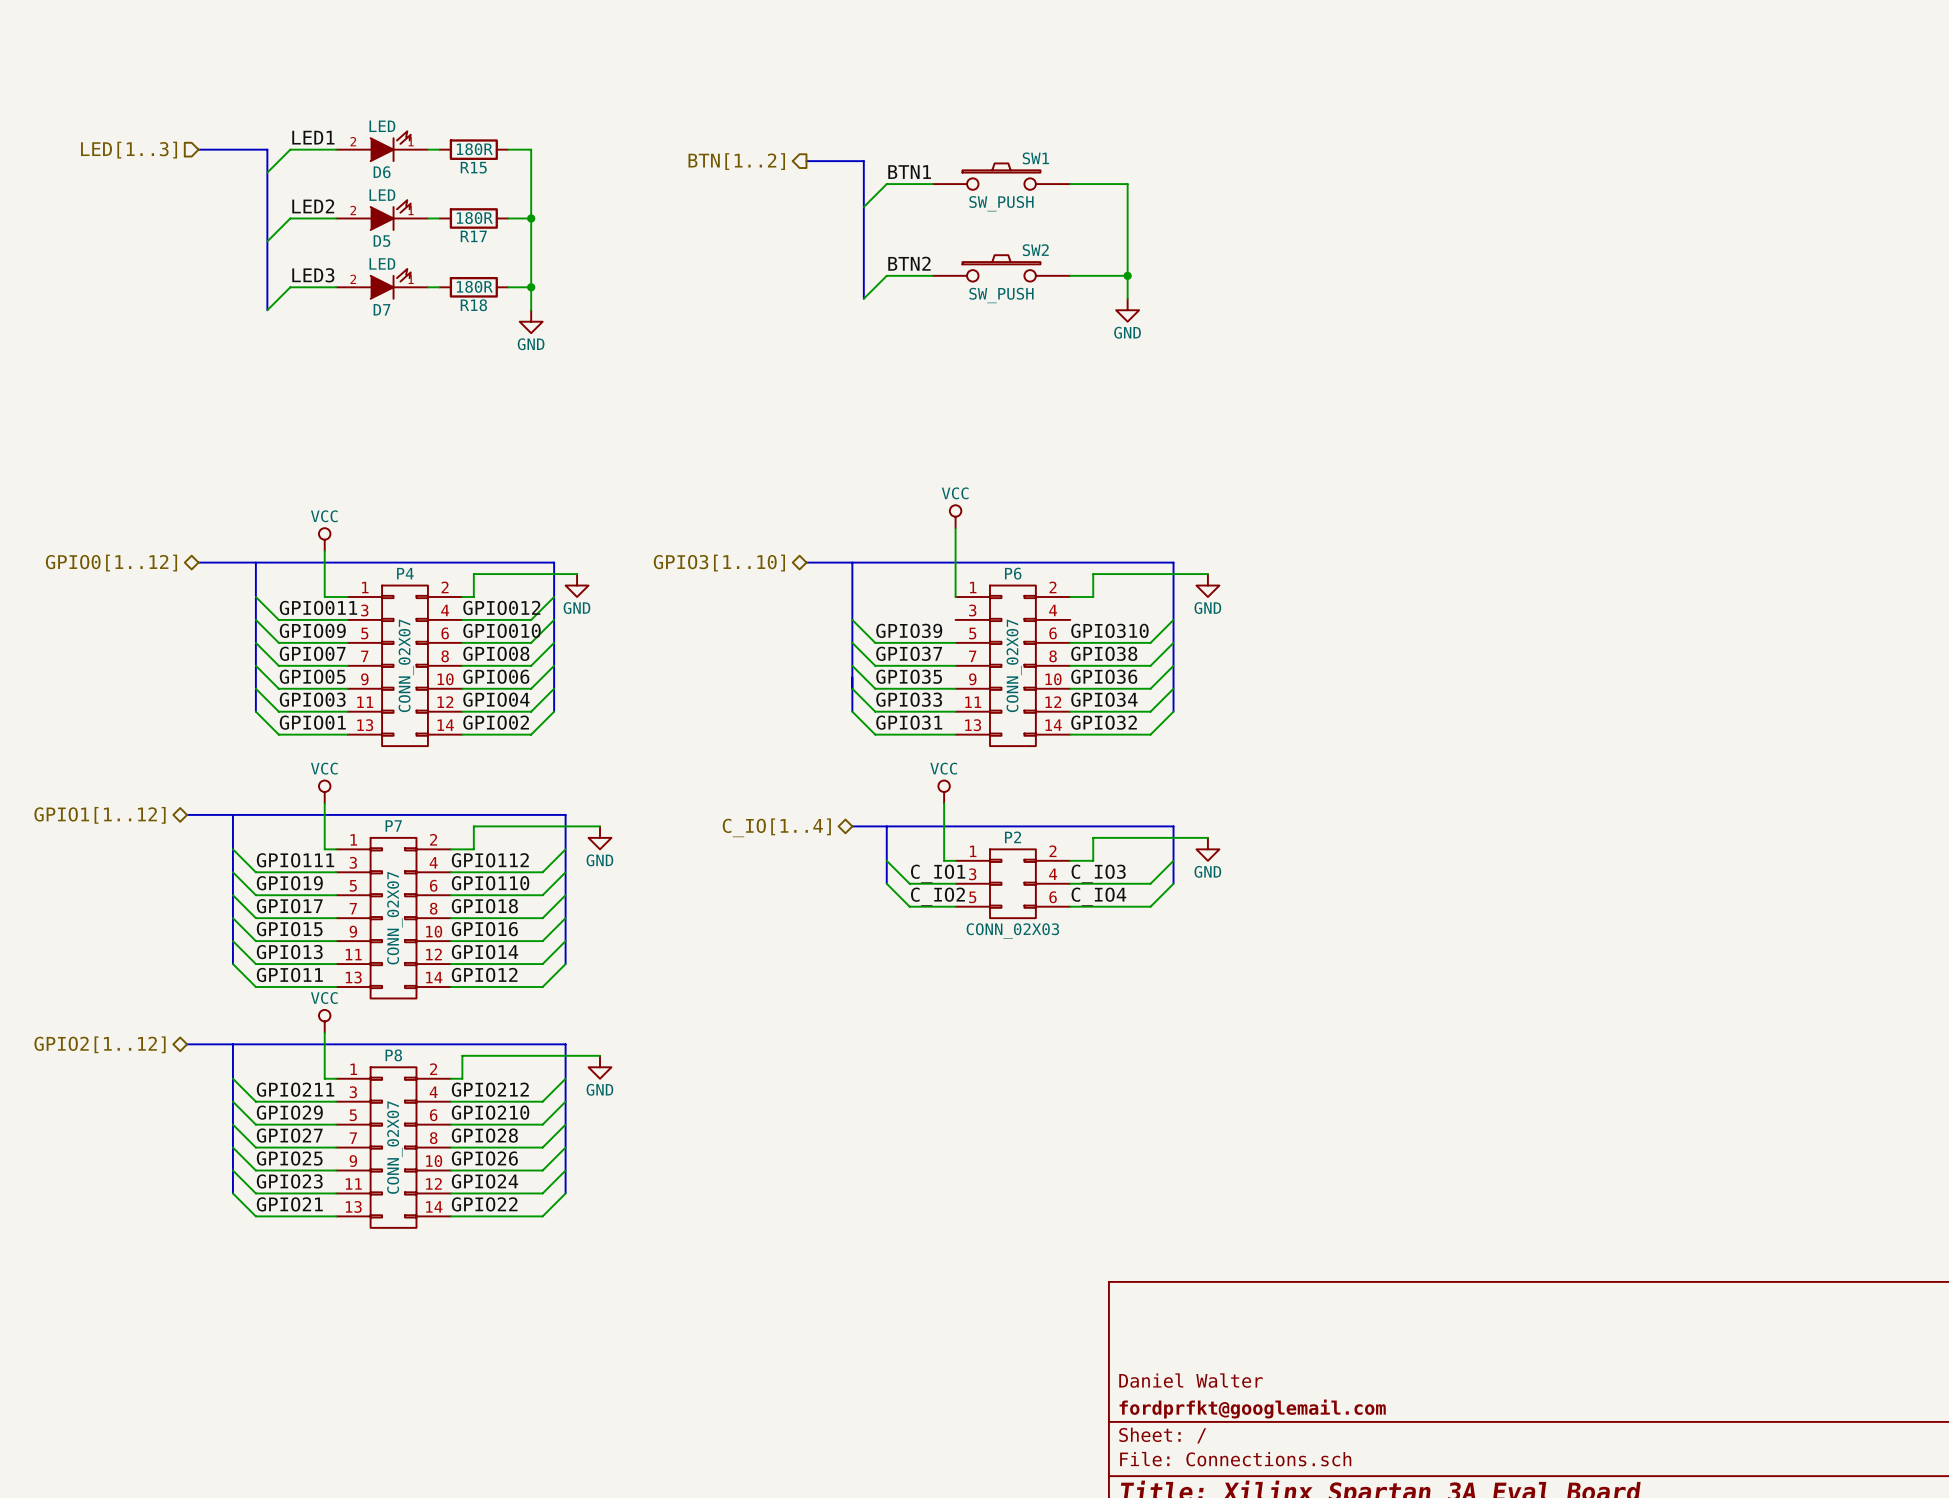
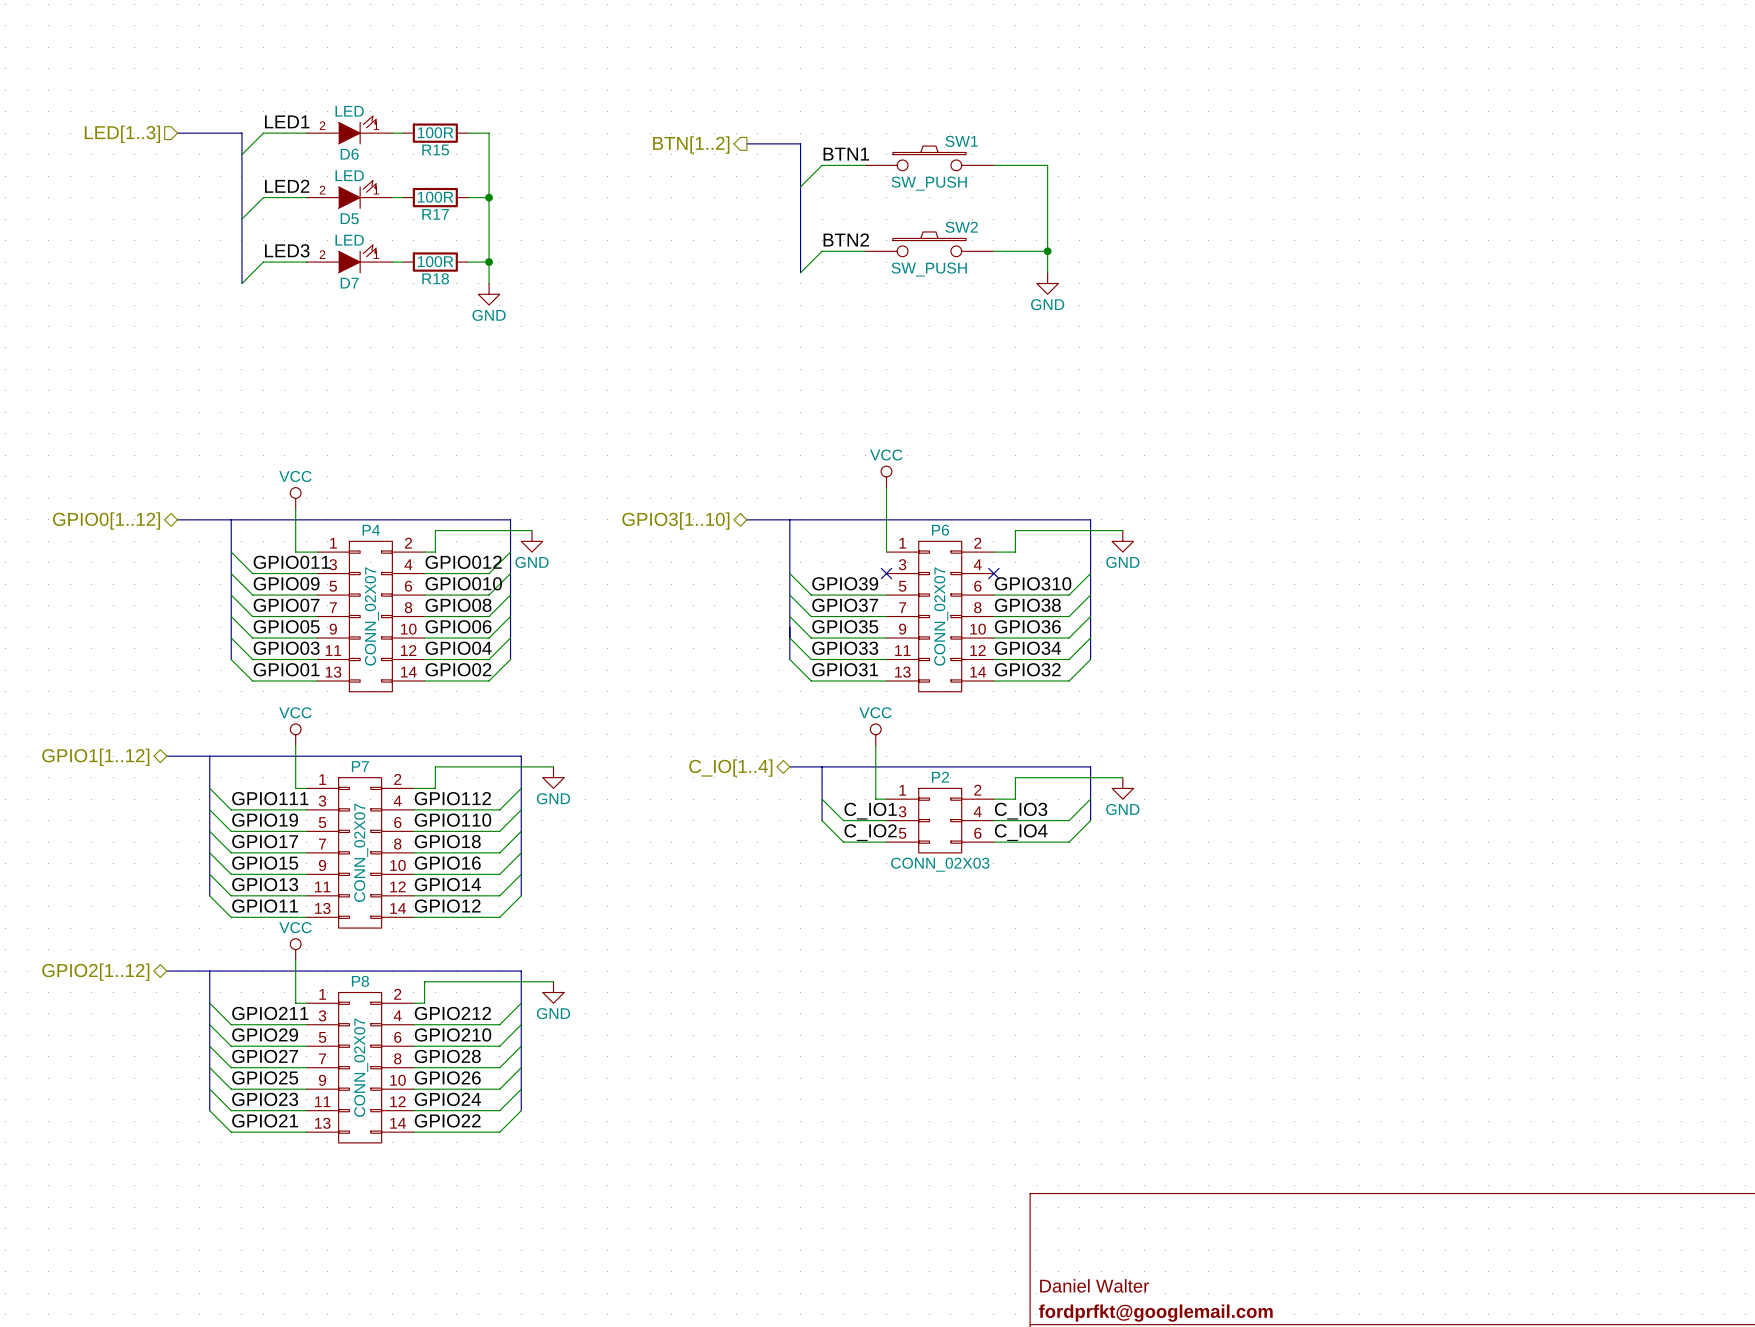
R15 value: 180R (474, 149) -> 100R (435, 132)
R17 value: 180R (474, 218) -> 100R (435, 197)
R18 value: 180R (474, 286) -> 100R (435, 261)
no-connect mark: none -> (886, 573)
no-connect mark: none -> (993, 573)

